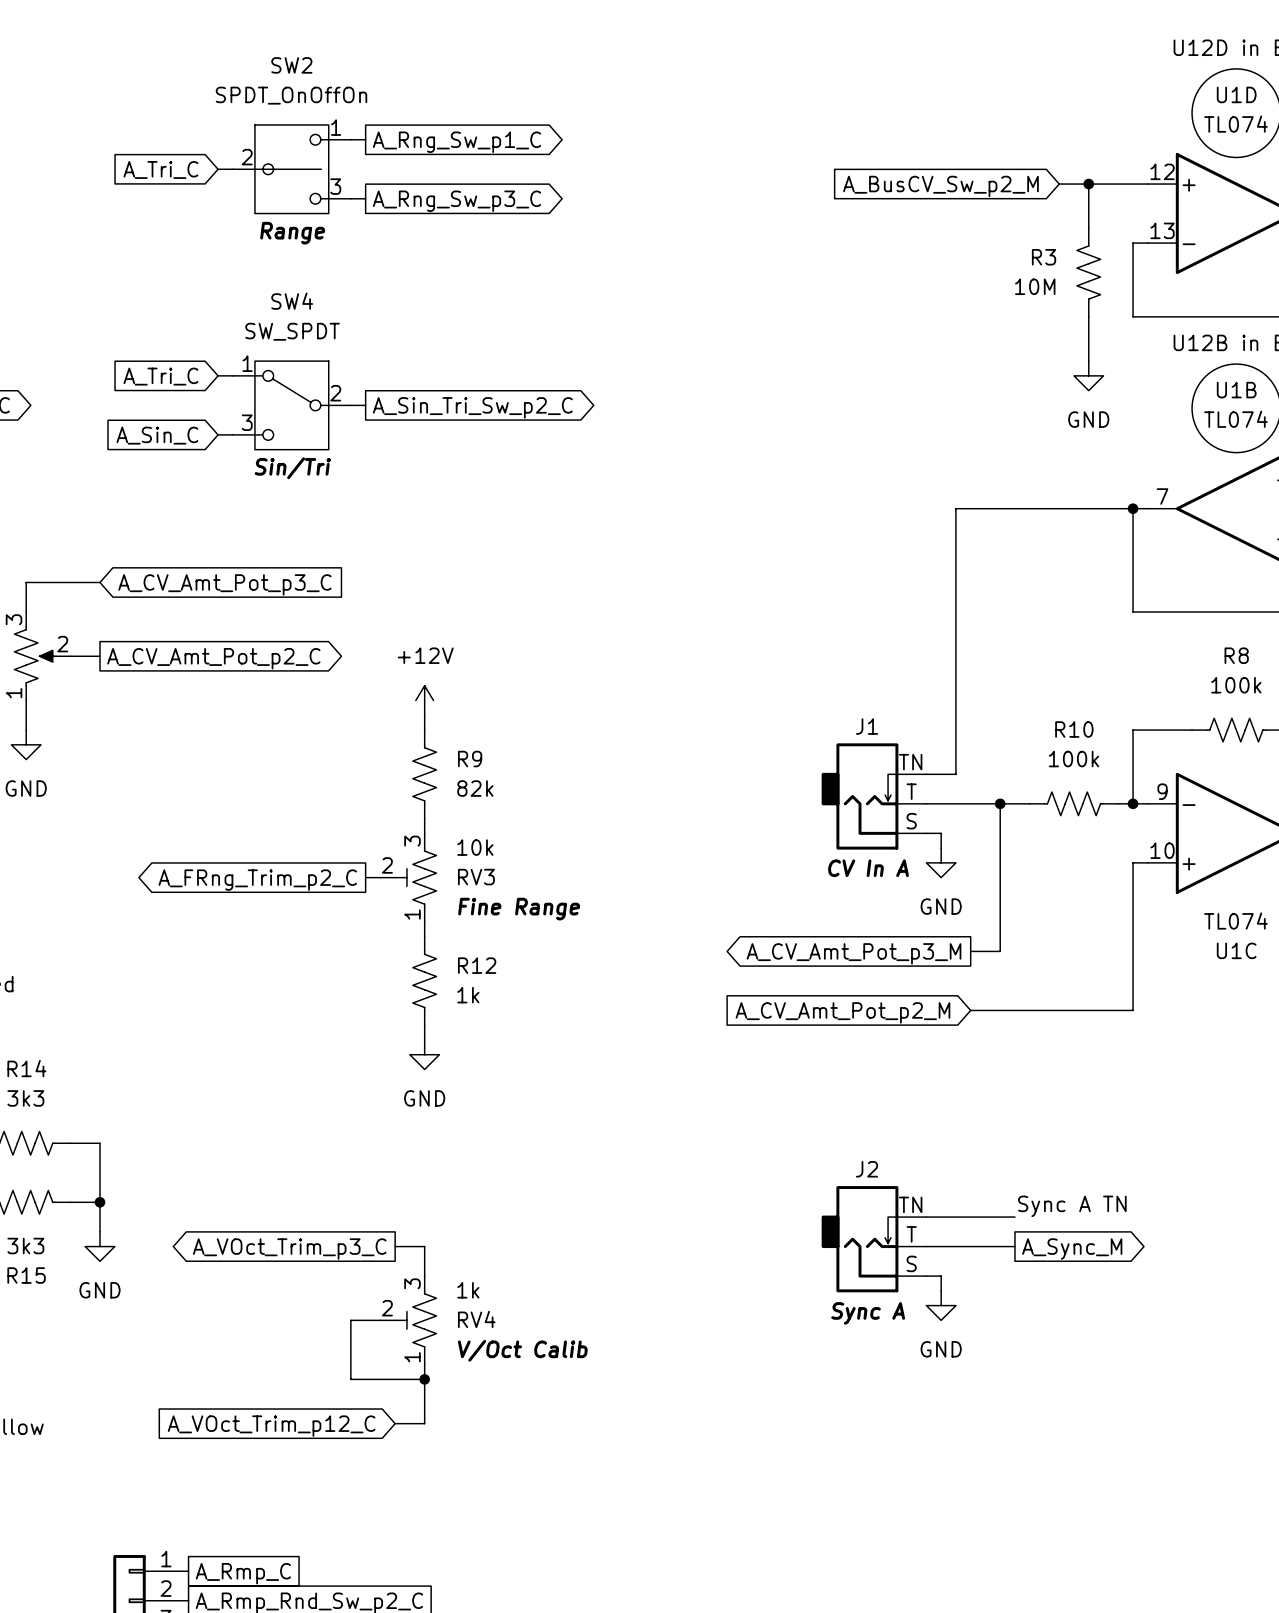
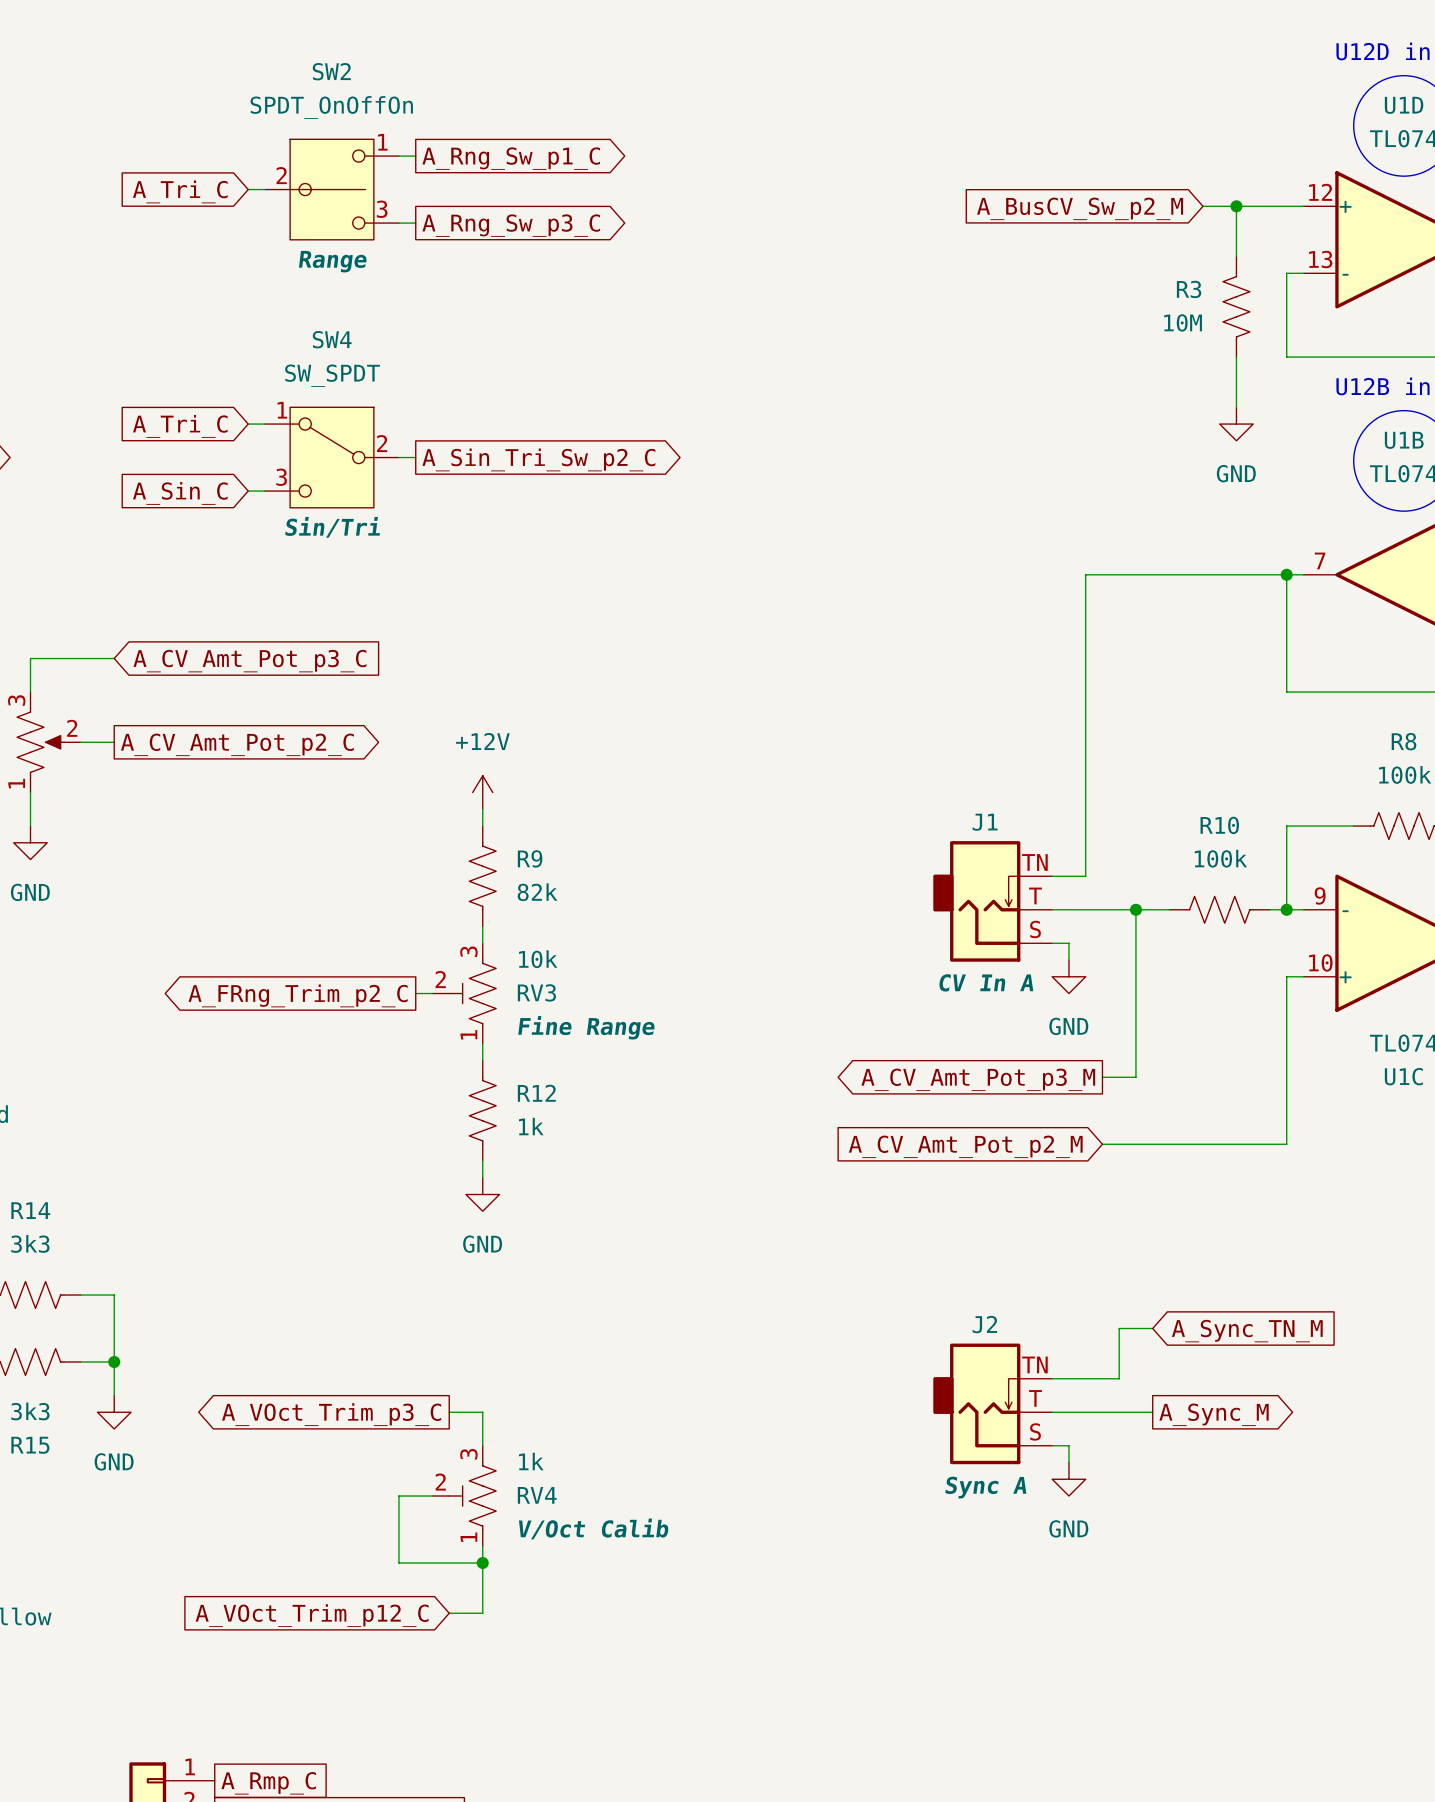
global label: none -> A_Sync_TN_M (1247, 1331)
label: Sync A TN (1072, 1206) -> none
wire: (985, 1217) (1014, 1217) -> (1119, 1378) (1119, 1328) (1152, 1328)

